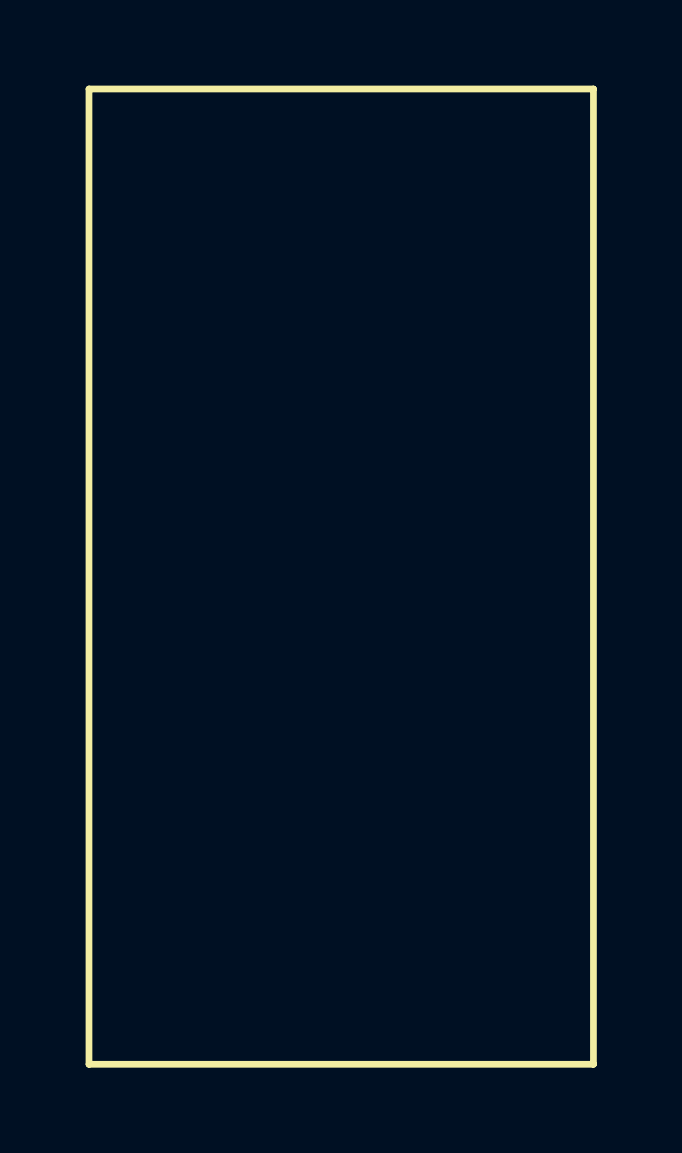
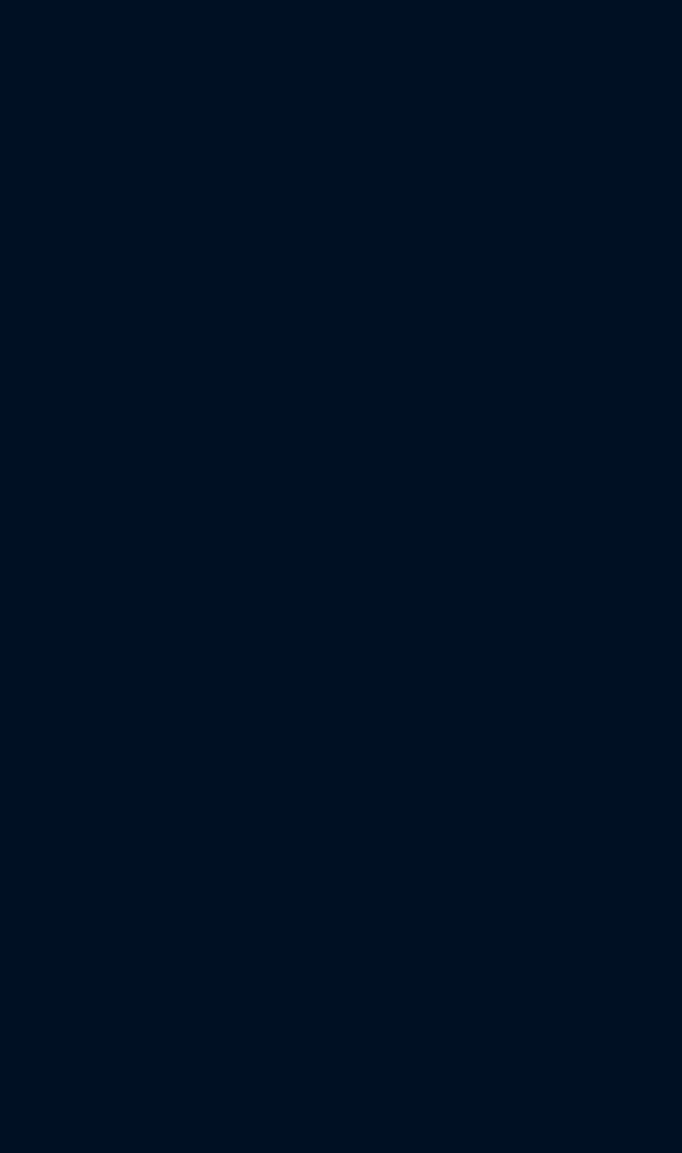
line: (88, 88) (88, 1064) (593, 1064) (593, 88) (88, 88) -> none

